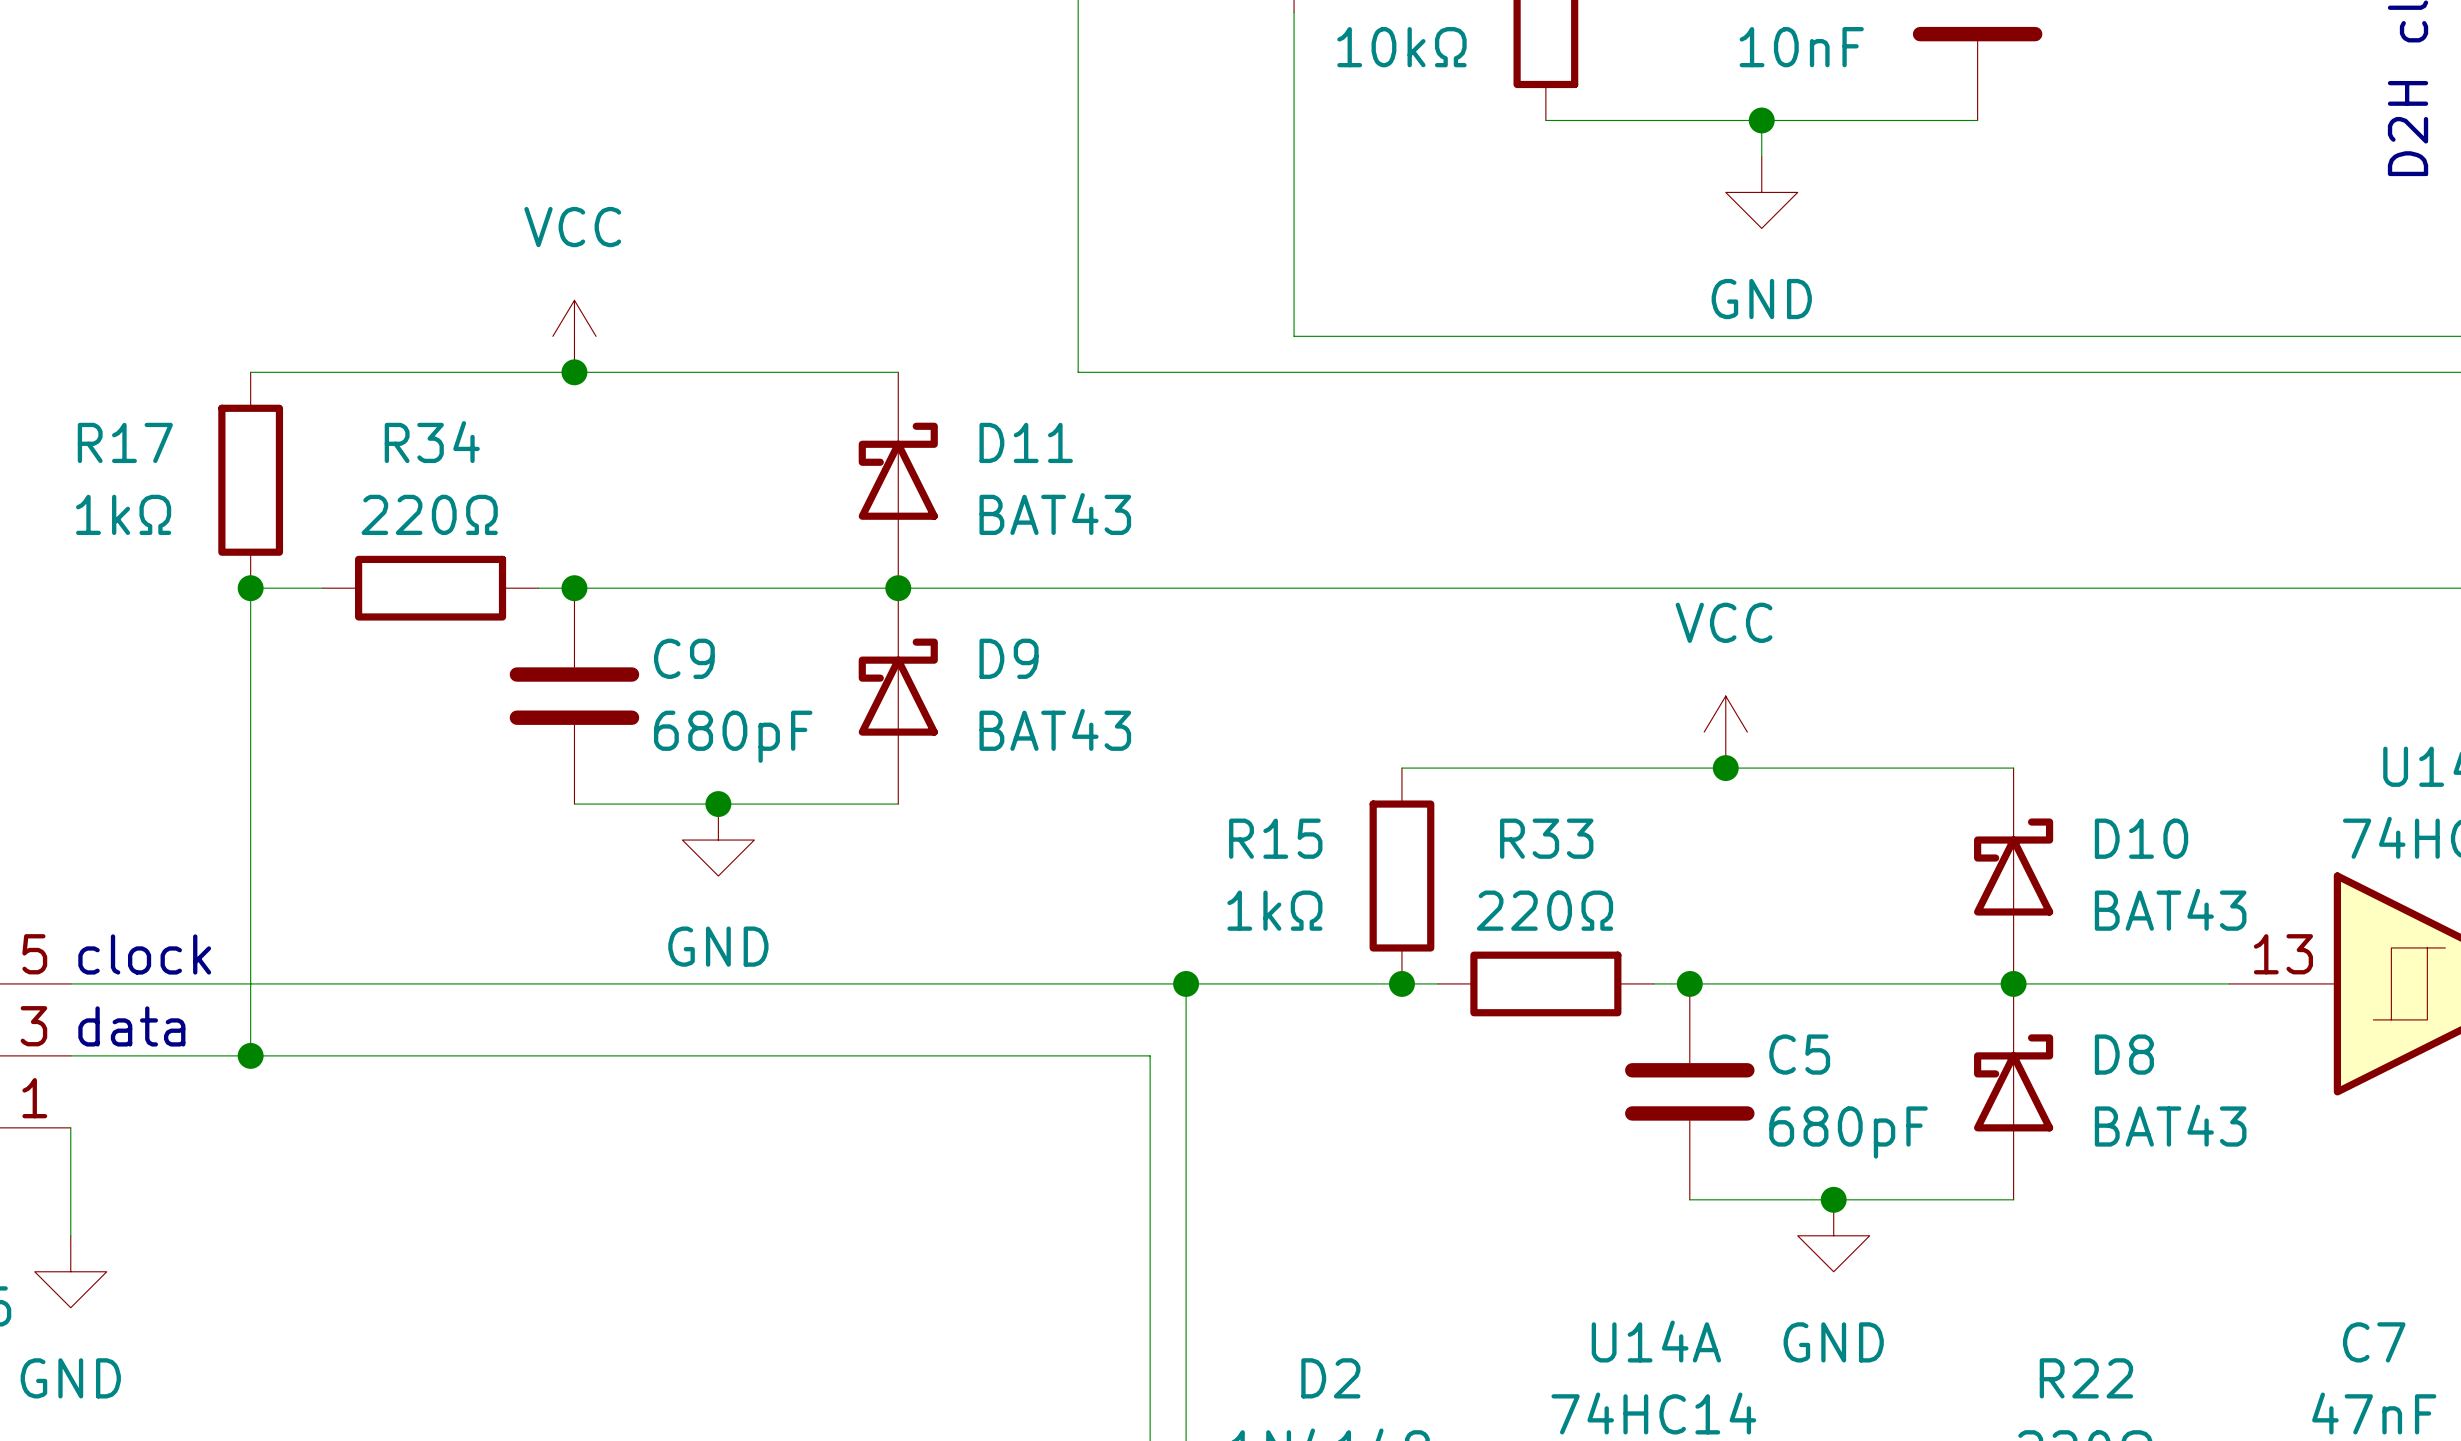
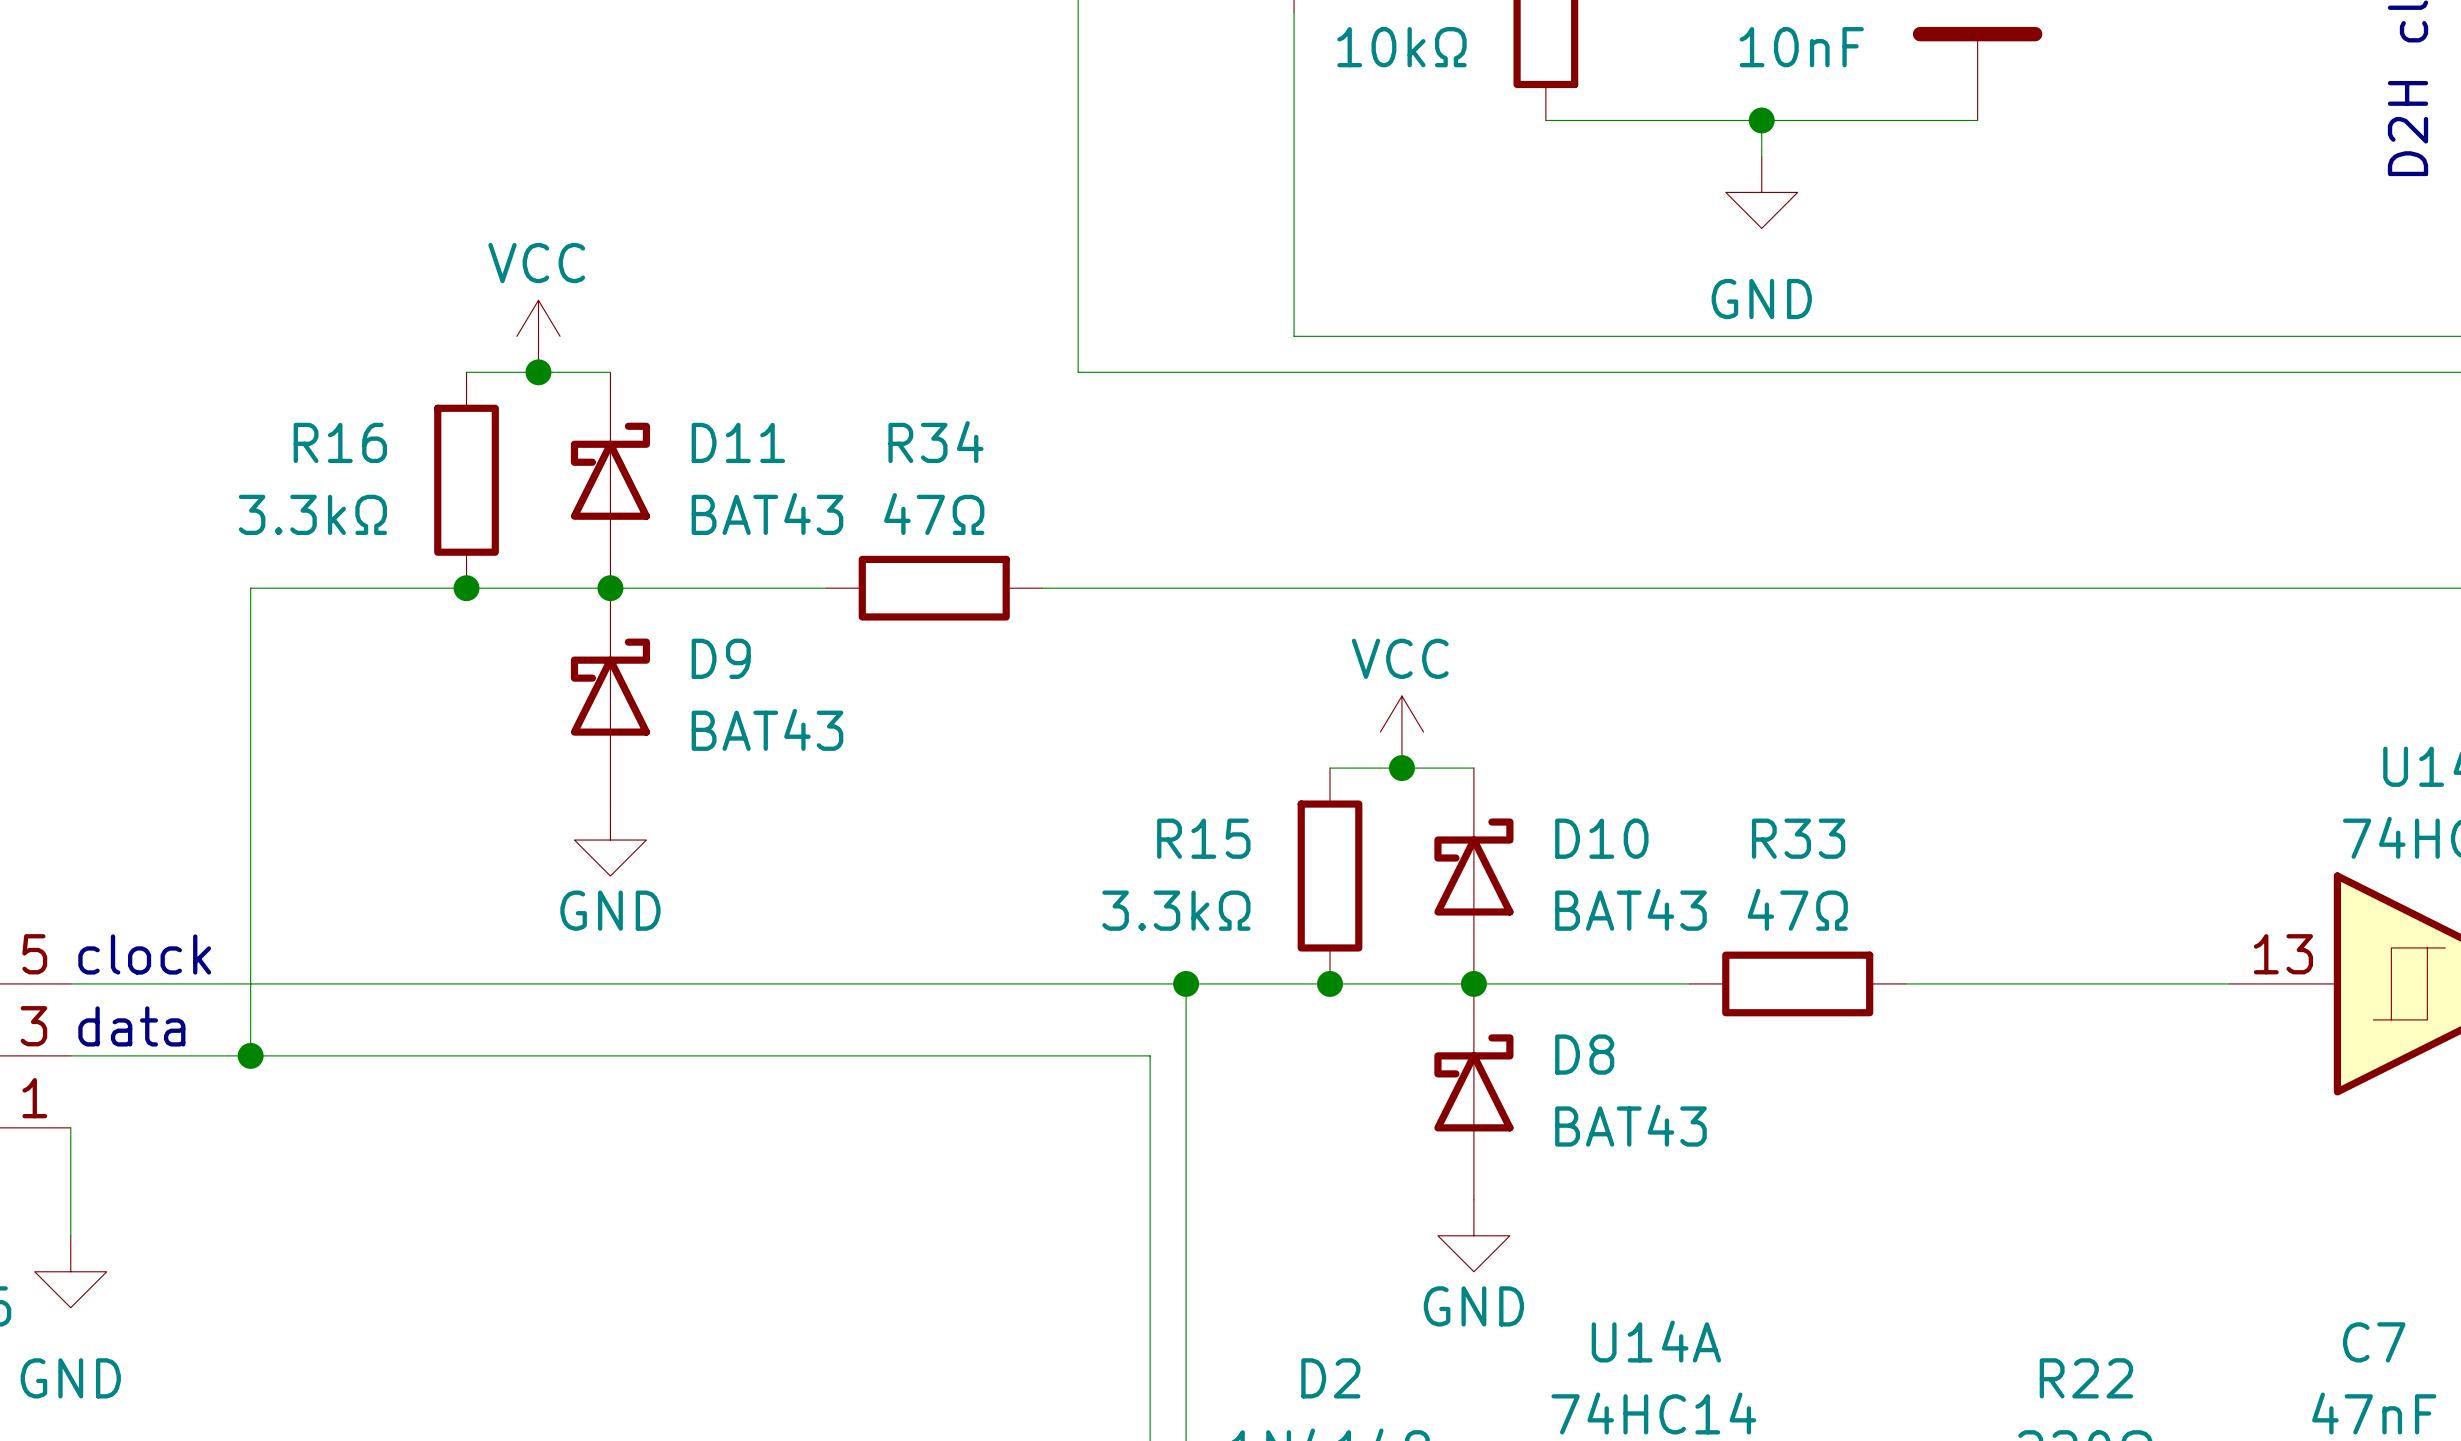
power symbol text position: VCC (572, 227) -> VCC (536, 263)
power symbol position: VCC (574, 336) -> VCC (538, 336)
wire: (250, 372) (466, 372) -> (322, 588) (538, 588)
junction position: (574, 372) -> (538, 372)
wire: (610, 372) (898, 372) -> none
R17: 1kΩ (250, 480) -> none
R16: none -> 3.3kΩ (466, 480)
D11 position: (898, 480) -> (610, 480)
R34 value: 220Ω (429, 514) -> 47Ω (934, 514)
junction: (250, 588) -> none
R34 position: (430, 588) -> (934, 588)
junction: none -> (466, 588)
junction position: (574, 588) -> (610, 588)
wire: (826, 588) (1042, 588) -> none
junction: (898, 588) -> none
power symbol text position: VCC (1724, 622) -> VCC (1400, 658)
C9: 680pF (574, 696) -> none
D9 position: (898, 696) -> (610, 696)
power symbol position: VCC (1725, 732) -> VCC (1401, 732)
wire: none -> (1330, 768) (1401, 768)
junction: none -> (1401, 768)
wire: (1473, 768) (2013, 768) -> none
junction: (1725, 768) -> none
wire: (574, 804) (898, 804) -> none
junction: (718, 804) -> none
power symbol position: GND (718, 840) -> GND (610, 840)
R15 position: (1401, 876) -> (1330, 876)
D10 position: (2013, 876) -> (1473, 876)
R15 value: 1kΩ (1274, 910) -> 3.3kΩ (1176, 910)
R33 value: 220Ω (1545, 910) -> 47Ω (1797, 909)
power symbol text position: GND (718, 946) -> GND (610, 910)
junction: none -> (1330, 983)
junction: (1401, 983) -> none
junction: none -> (1473, 983)
R33 position: (1545, 983) -> (1797, 983)
wire: (1689, 983) (1905, 983) -> (1437, 983) (1653, 983)
junction: (1689, 983) -> none
junction: (2013, 983) -> none
C5: 680pF (1689, 1091) -> none
D8 position: (2013, 1091) -> (1473, 1091)
wire: (1689, 1199) (2013, 1199) -> none
junction: (1833, 1199) -> none
power symbol position: GND (1833, 1235) -> GND (1473, 1235)
power symbol text position: GND (1833, 1342) -> GND (1473, 1306)

